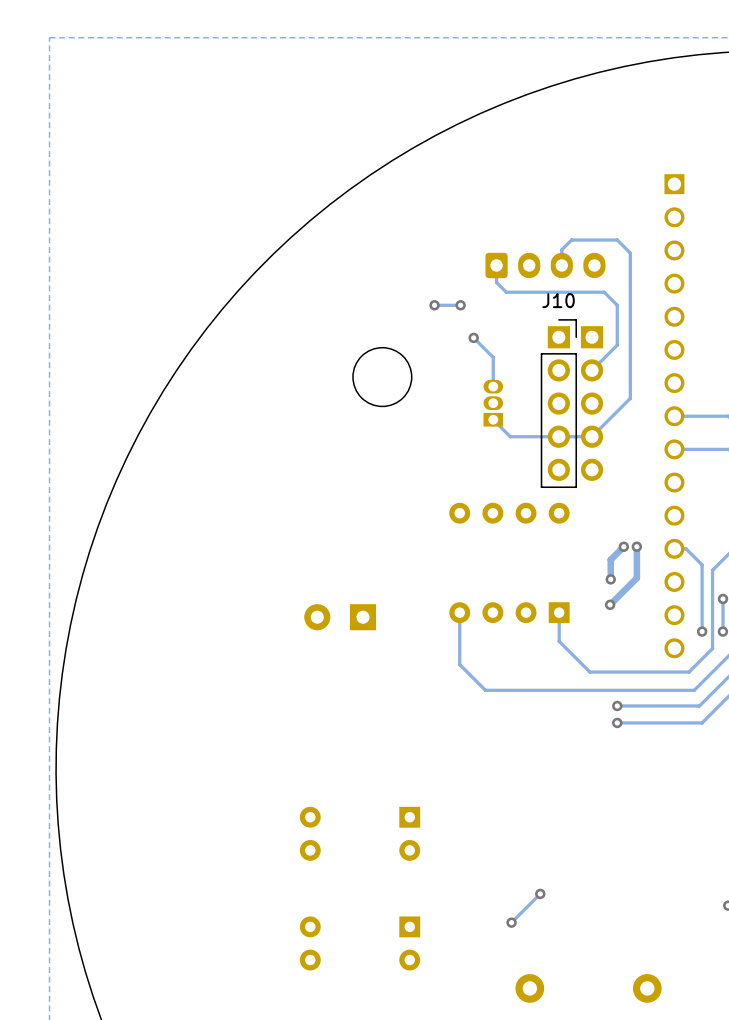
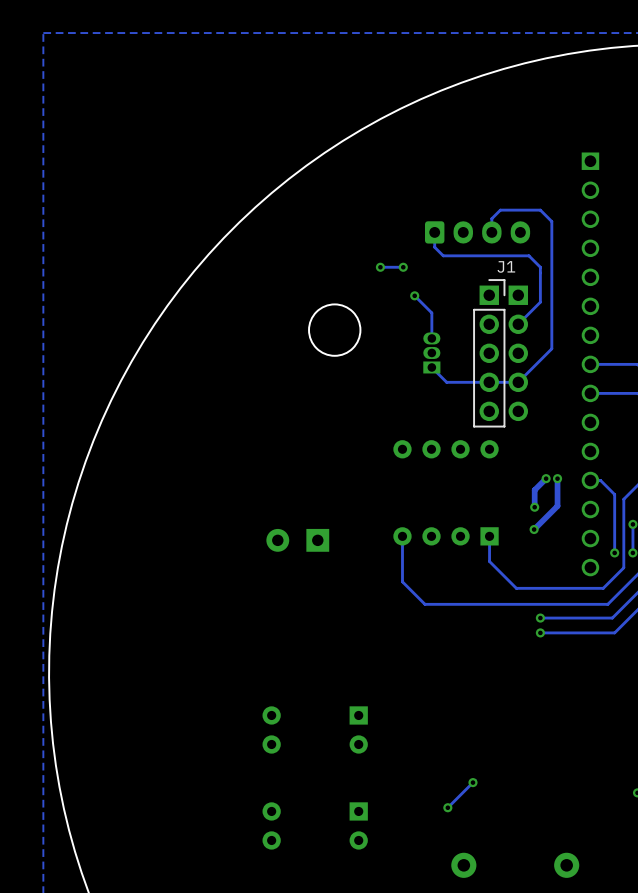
J10 name: J10 (558, 300) -> J1 (506, 266)

